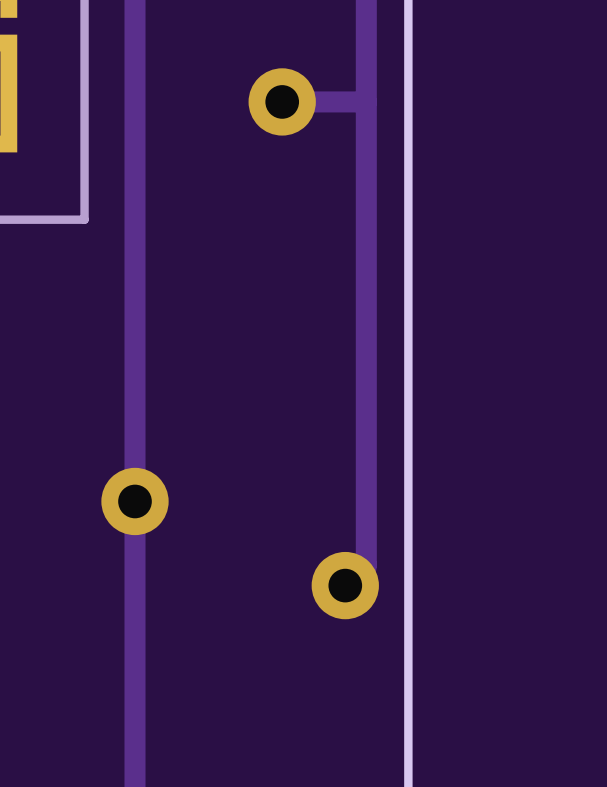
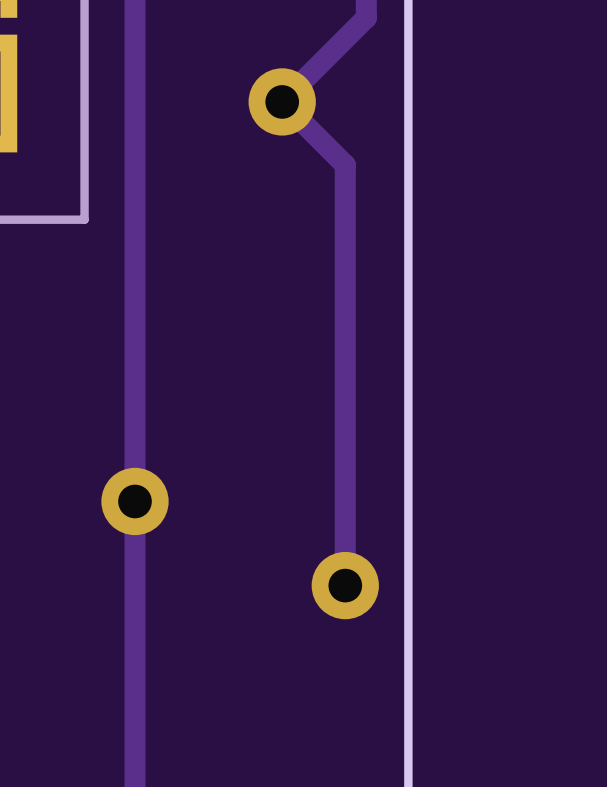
track: (366, 17) (366, 564) (365, 571) (360, 579) (354, 583) (345, 585) -> (366, 17) (282, 101) (345, 165) (345, 585)
track: (366, 101) (282, 101) -> none

